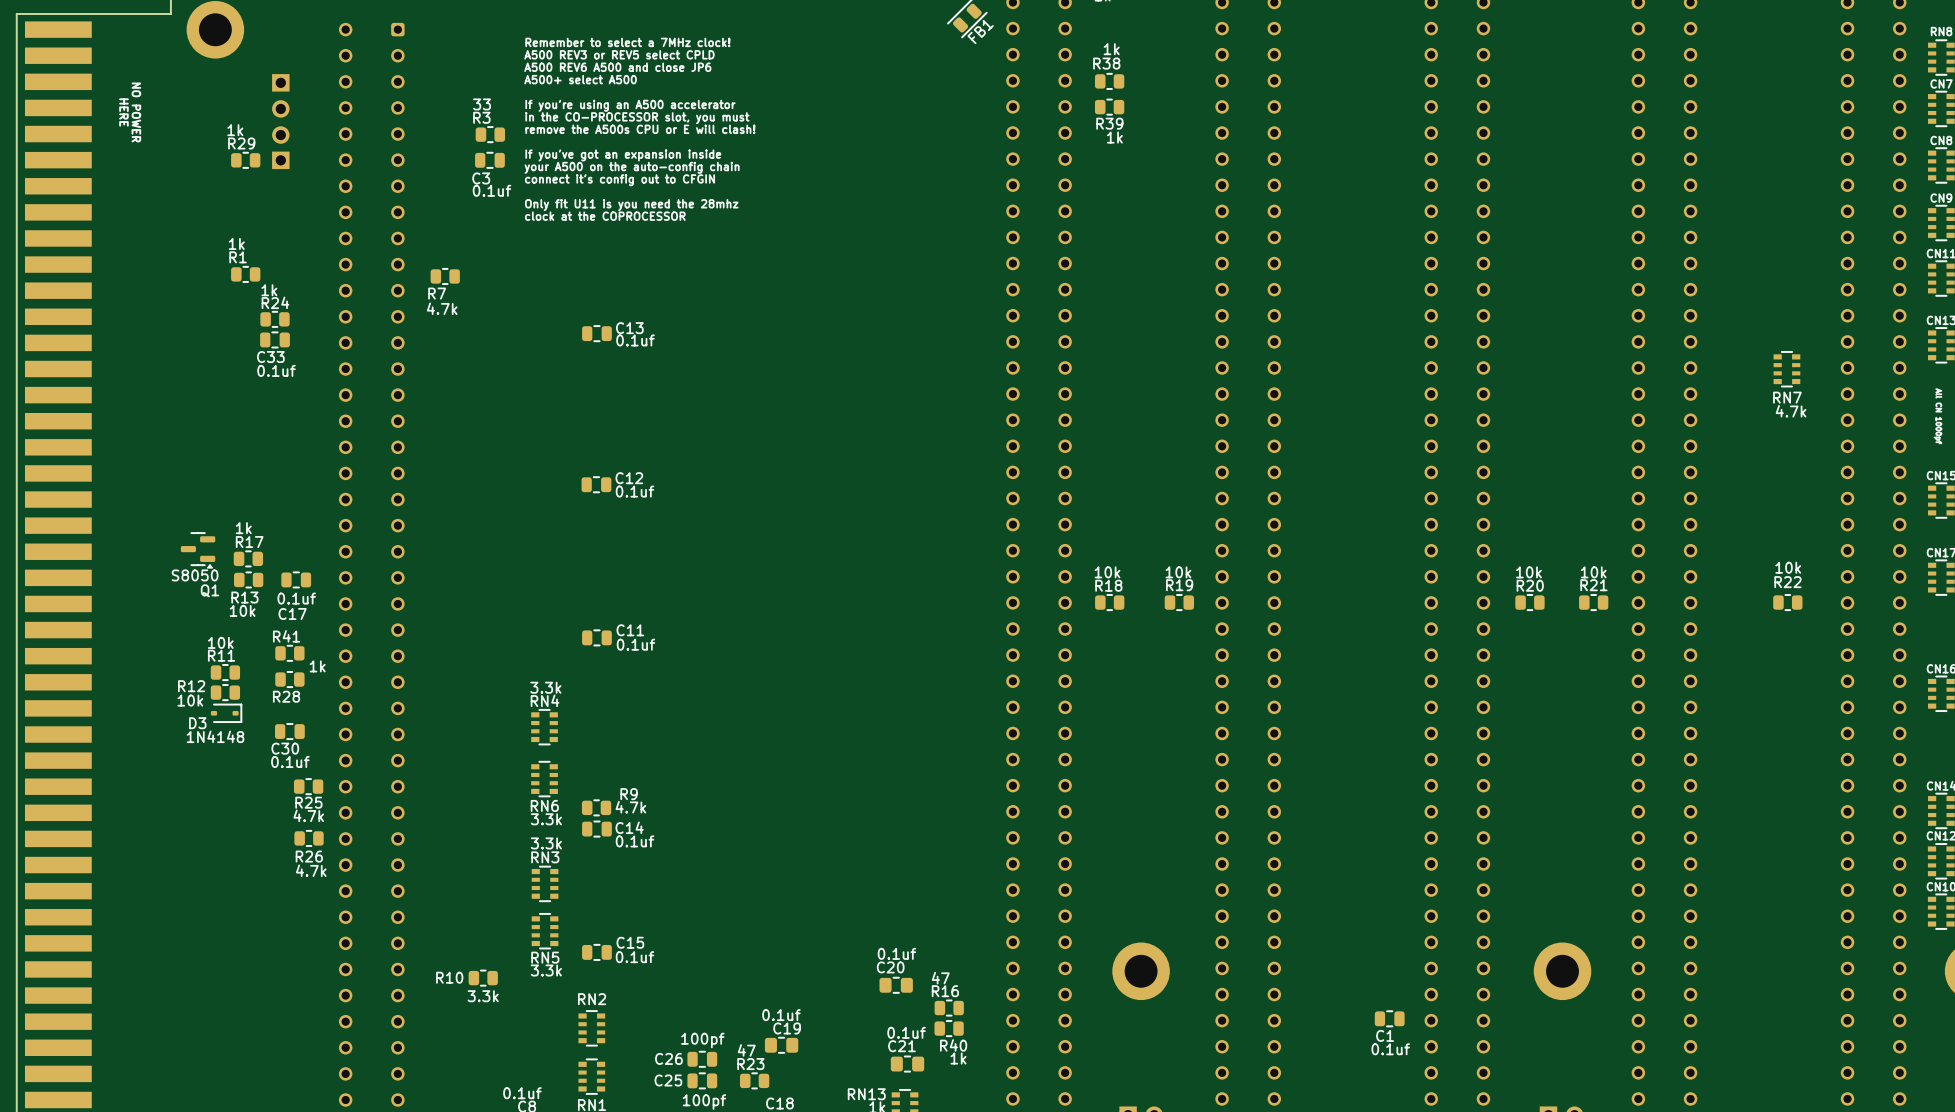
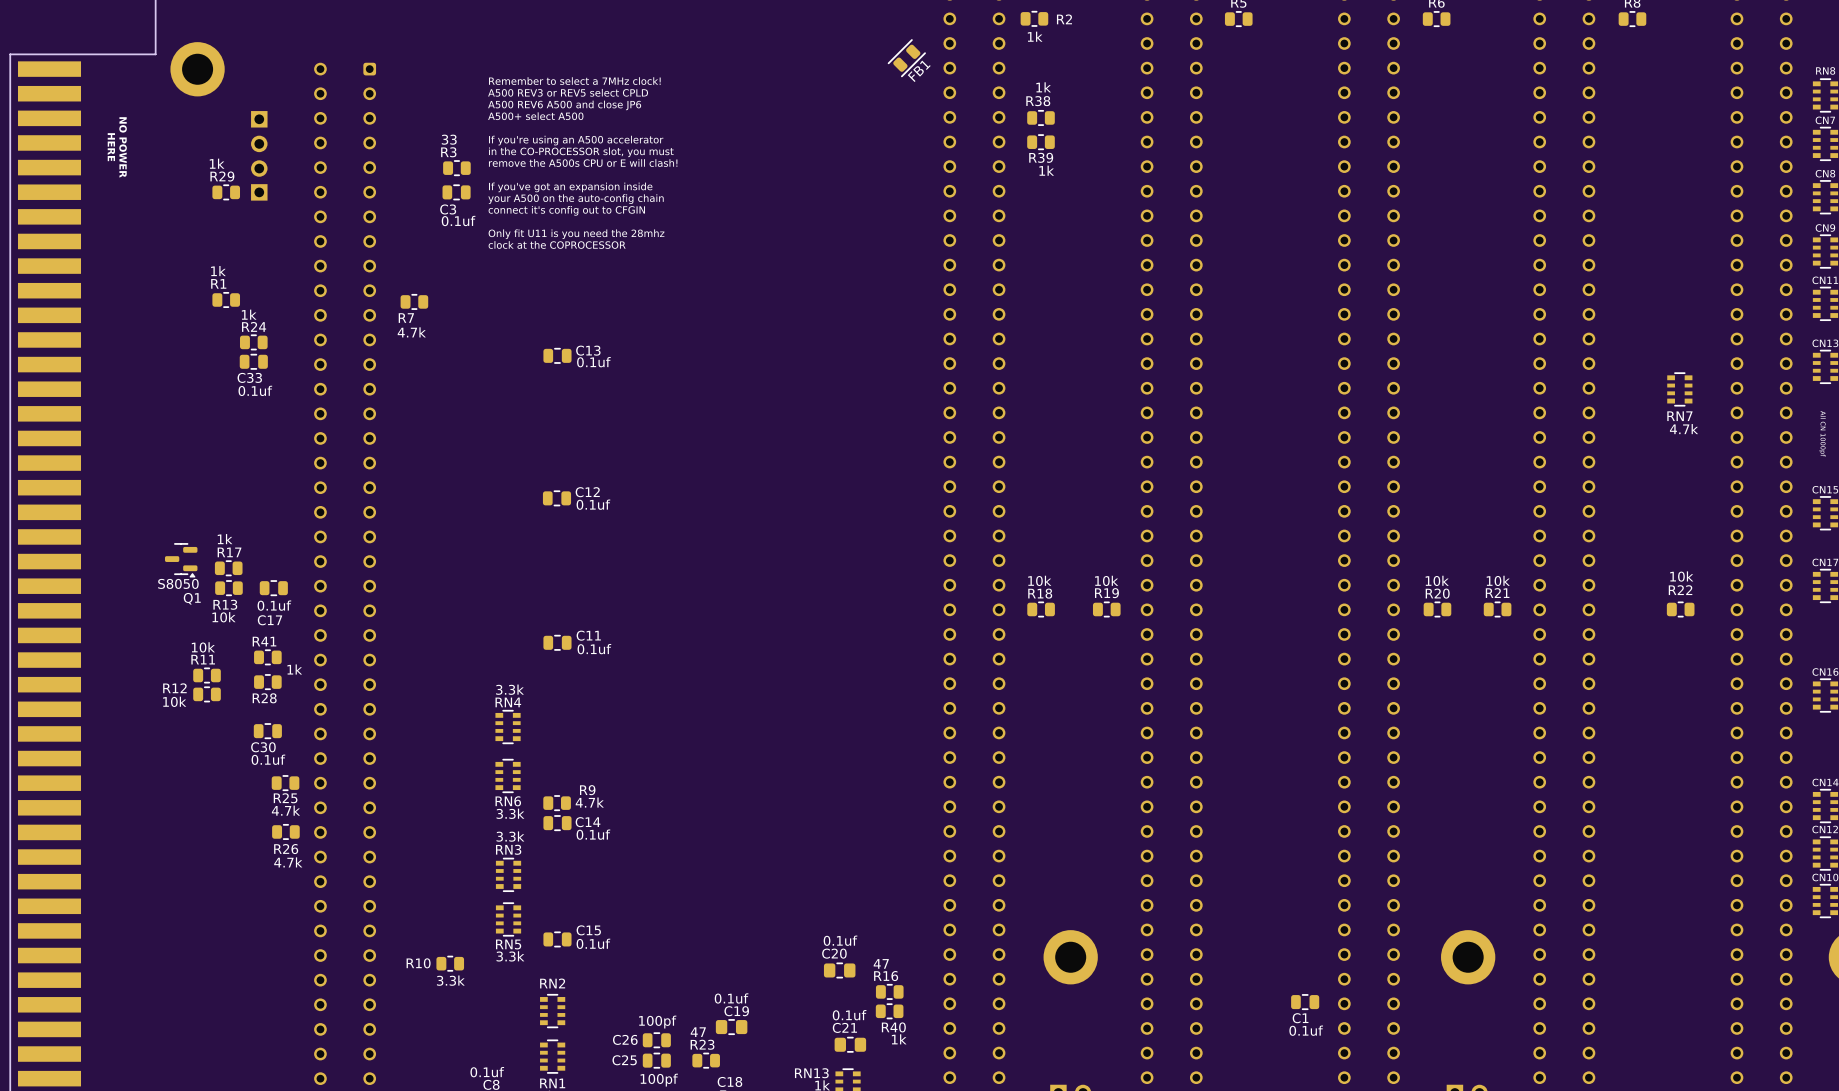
D3: 1N4148 (226, 713) -> none

